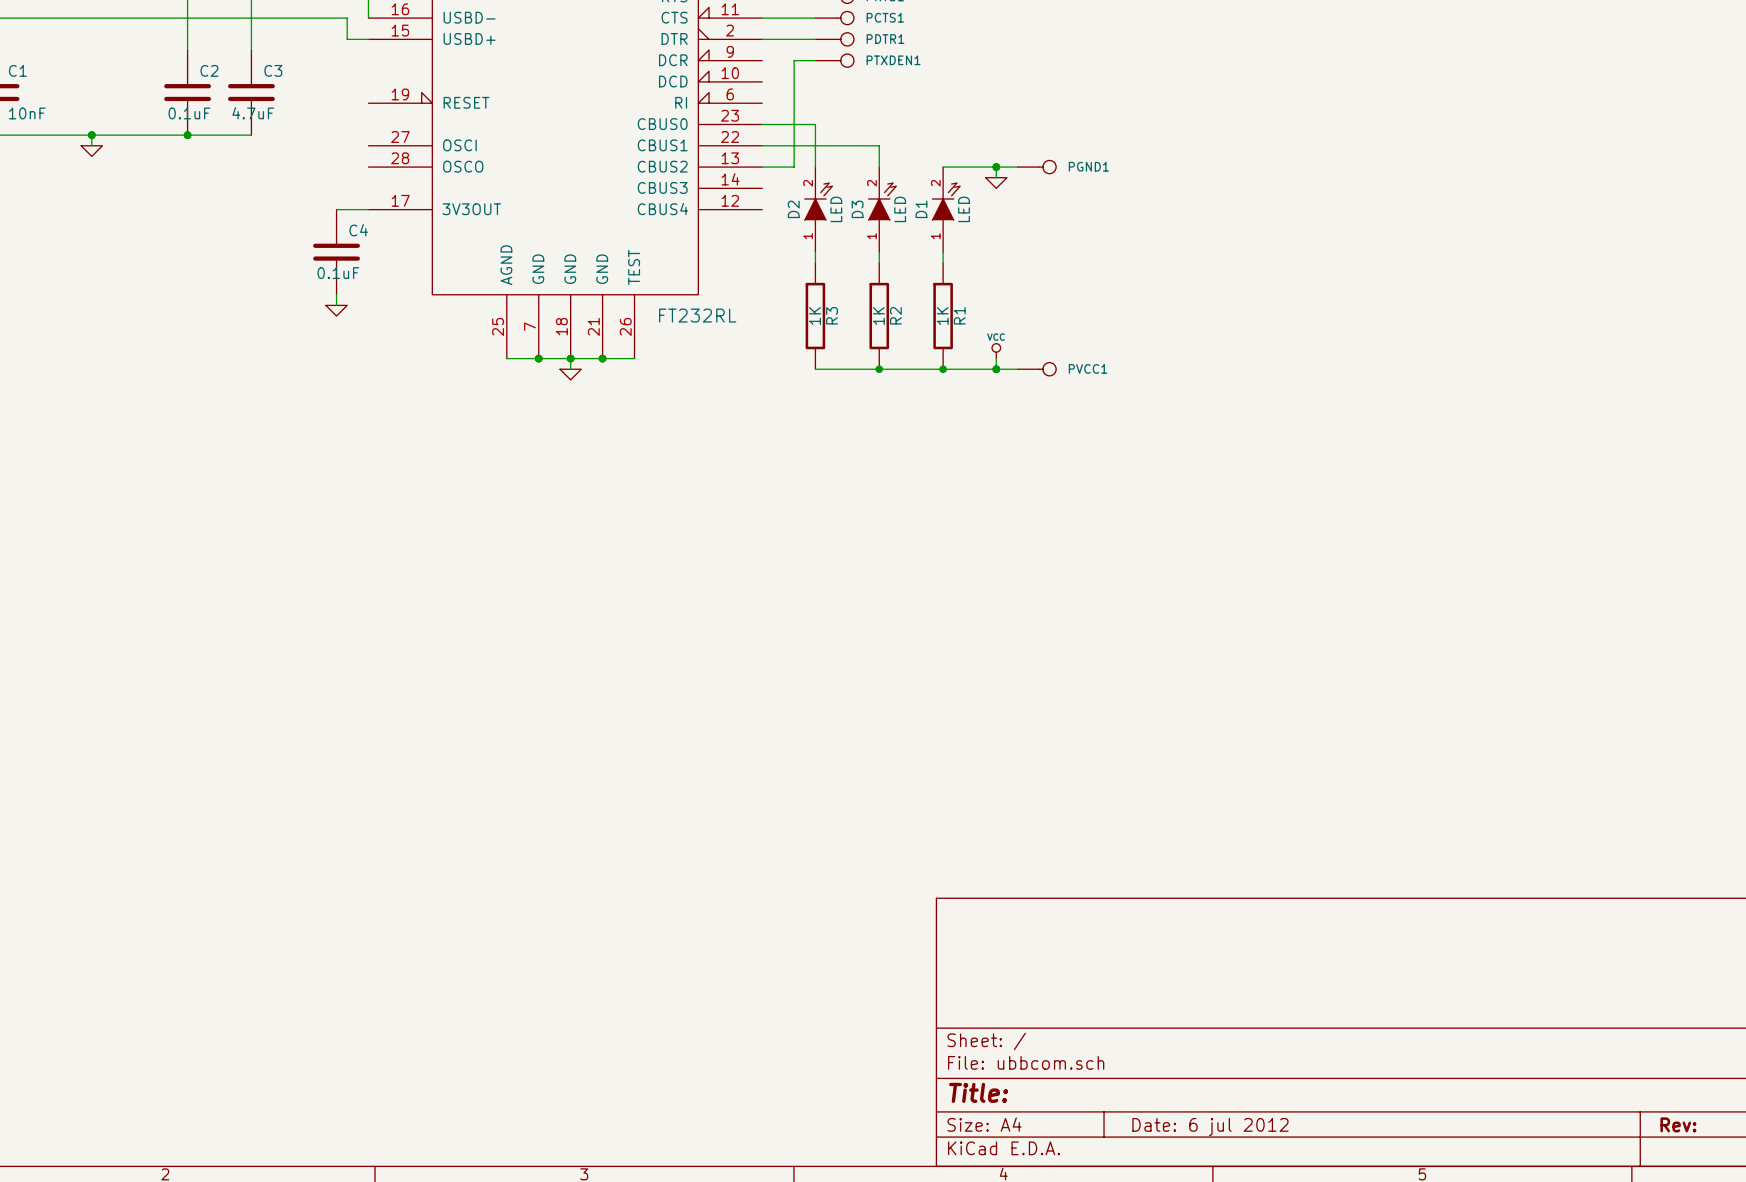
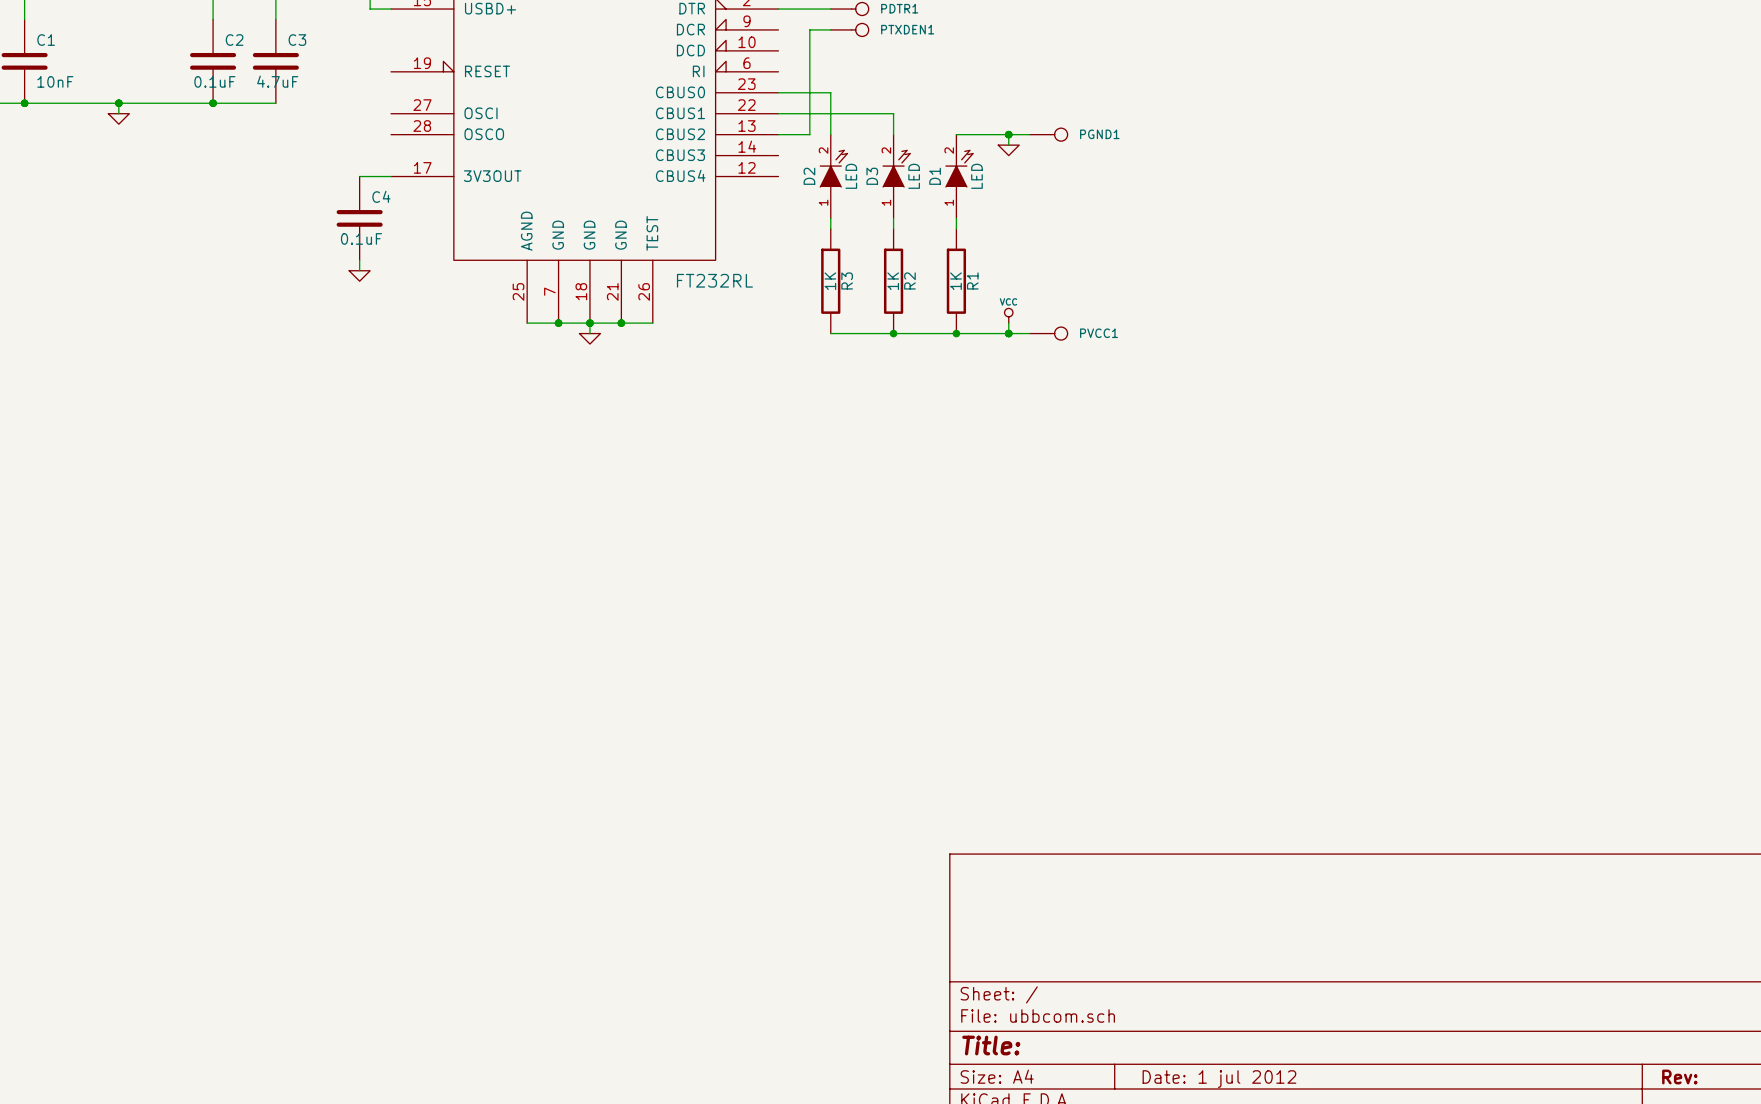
title block: Date: 6 jul 2012 (1210, 1126) -> Date: 1 jul 2012 (1219, 1079)

